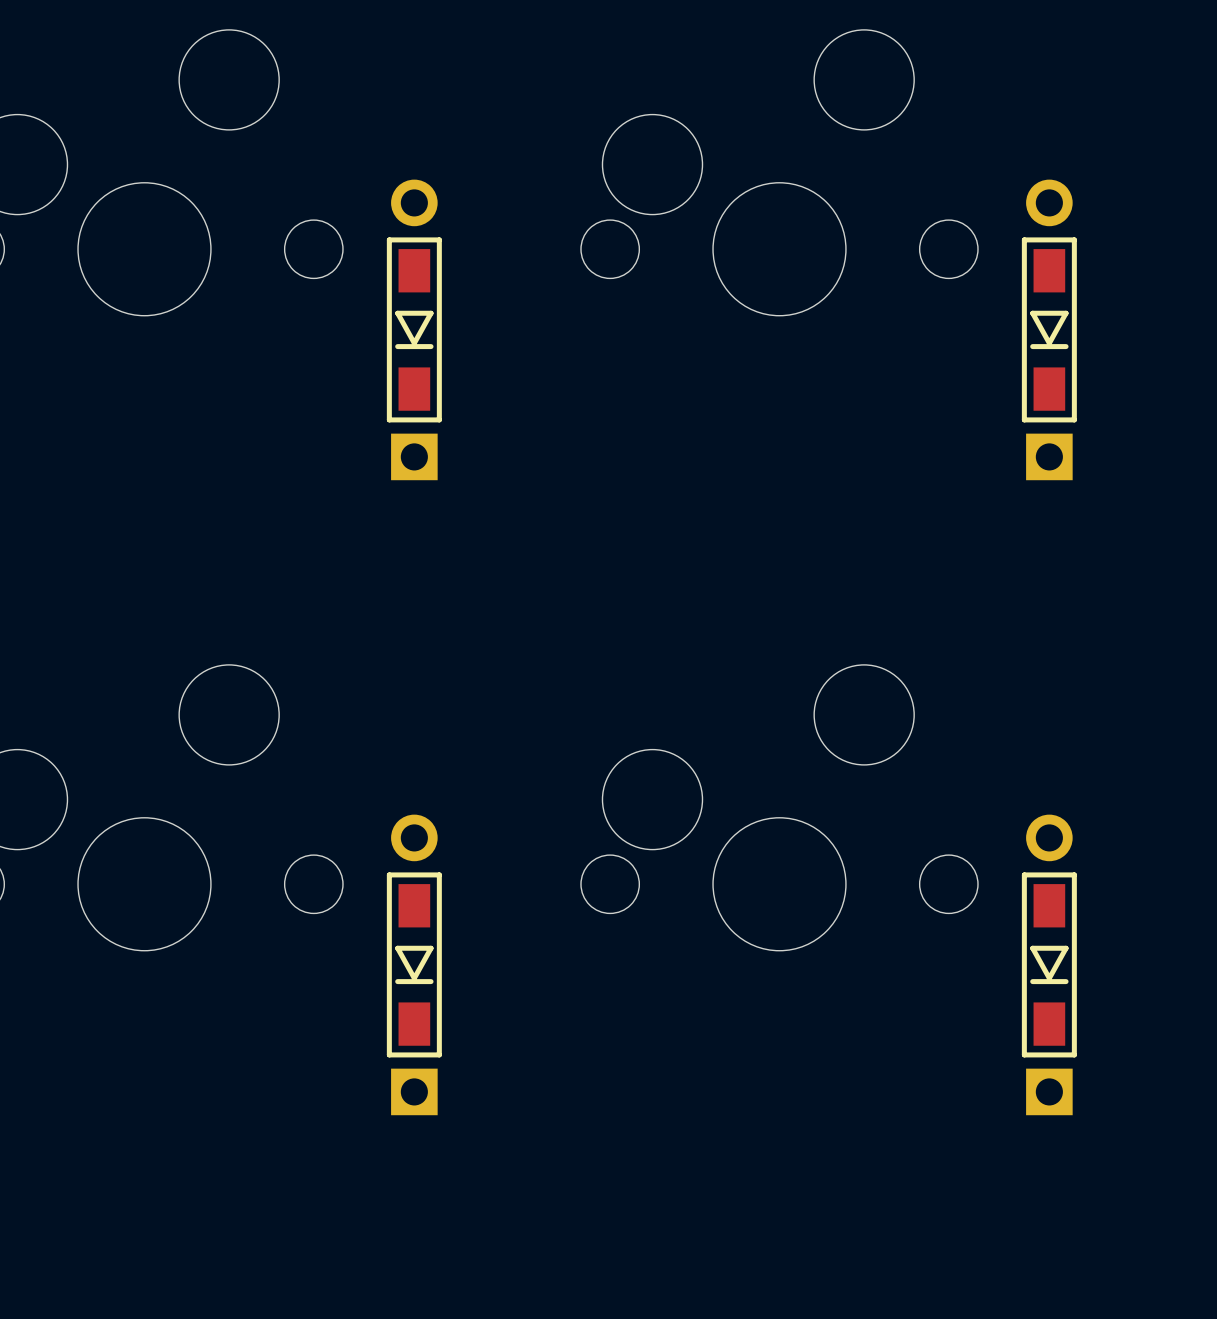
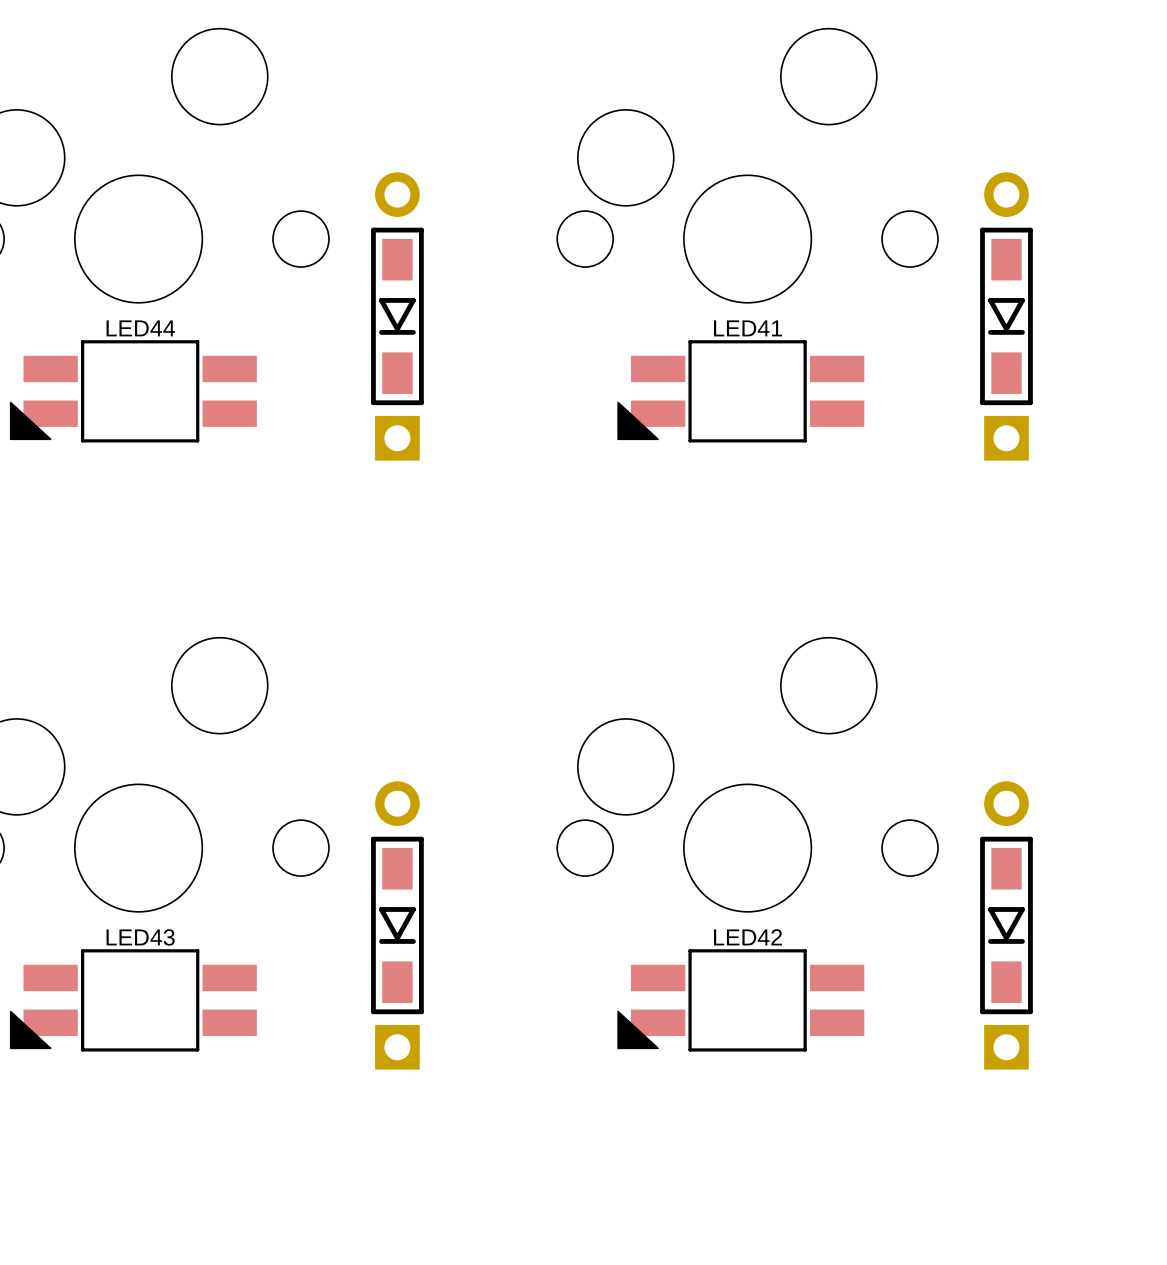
LED44: none -> (133, 391)
LED41: none -> (740, 391)
LED43: none -> (133, 1000)
LED42: none -> (740, 1000)

